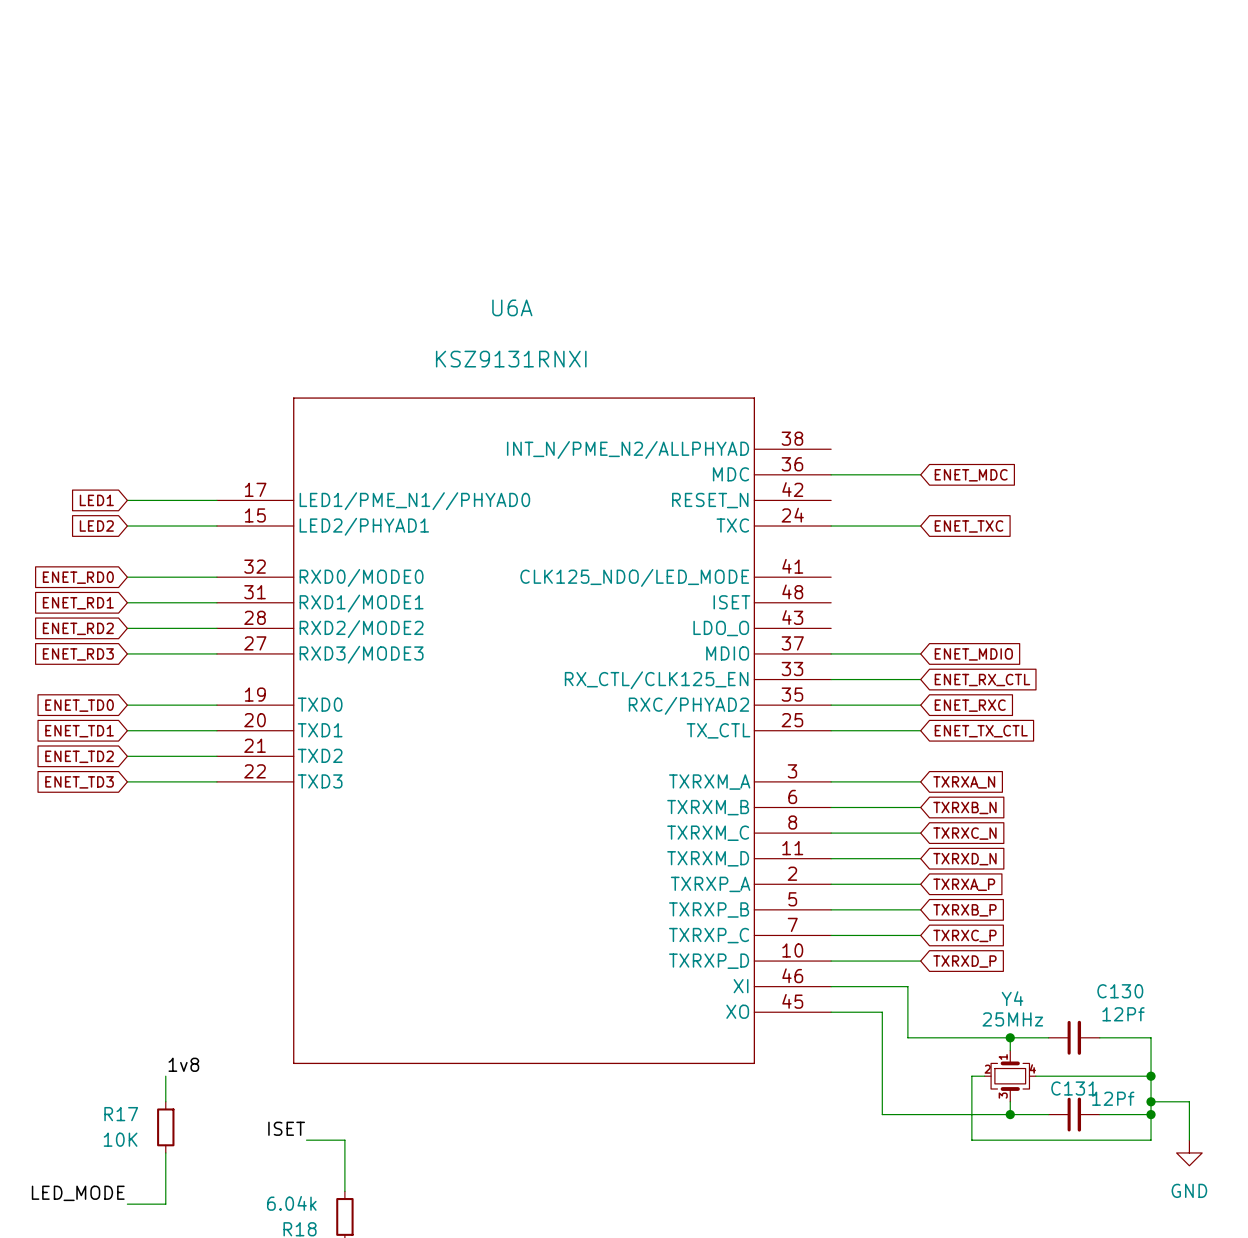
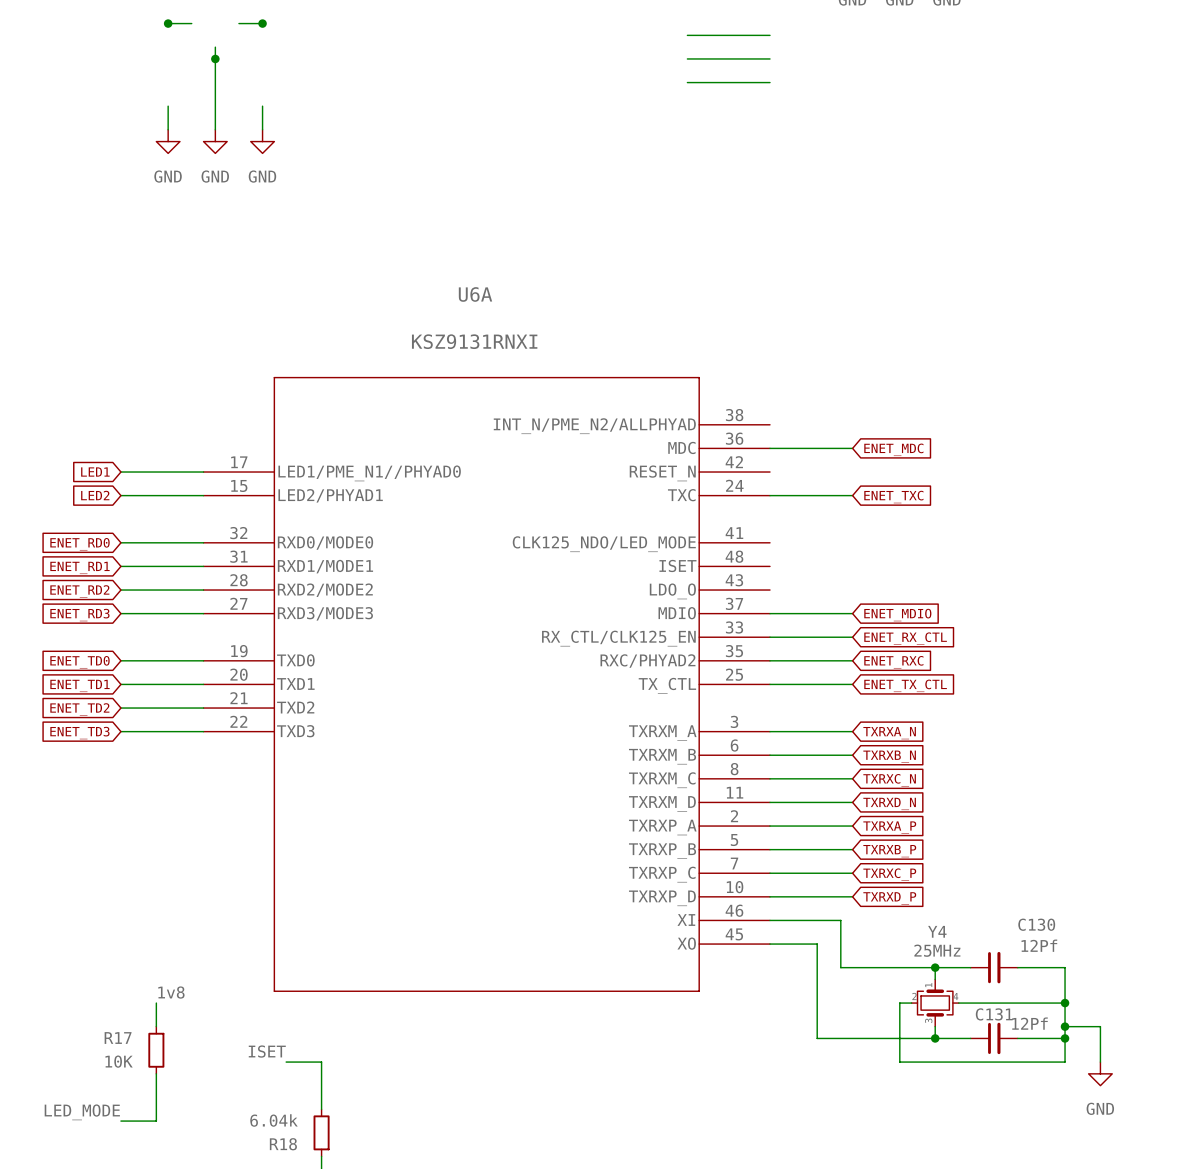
wire: none -> (168, 23) (191, 23)
junction: none -> (168, 23)
wire: none -> (238, 23) (262, 23)
junction: none -> (262, 23)
wire: none -> (687, 35) (770, 35)
wire: none -> (215, 47) (215, 129)
junction: none -> (215, 58)
wire: none -> (687, 58) (770, 58)
wire: none -> (687, 82) (770, 82)
wire: none -> (168, 106) (168, 129)
wire: none -> (262, 106) (262, 129)
power symbol: none -> GND (168, 141)
power symbol: none -> GND (215, 141)
power symbol: none -> GND (262, 141)

